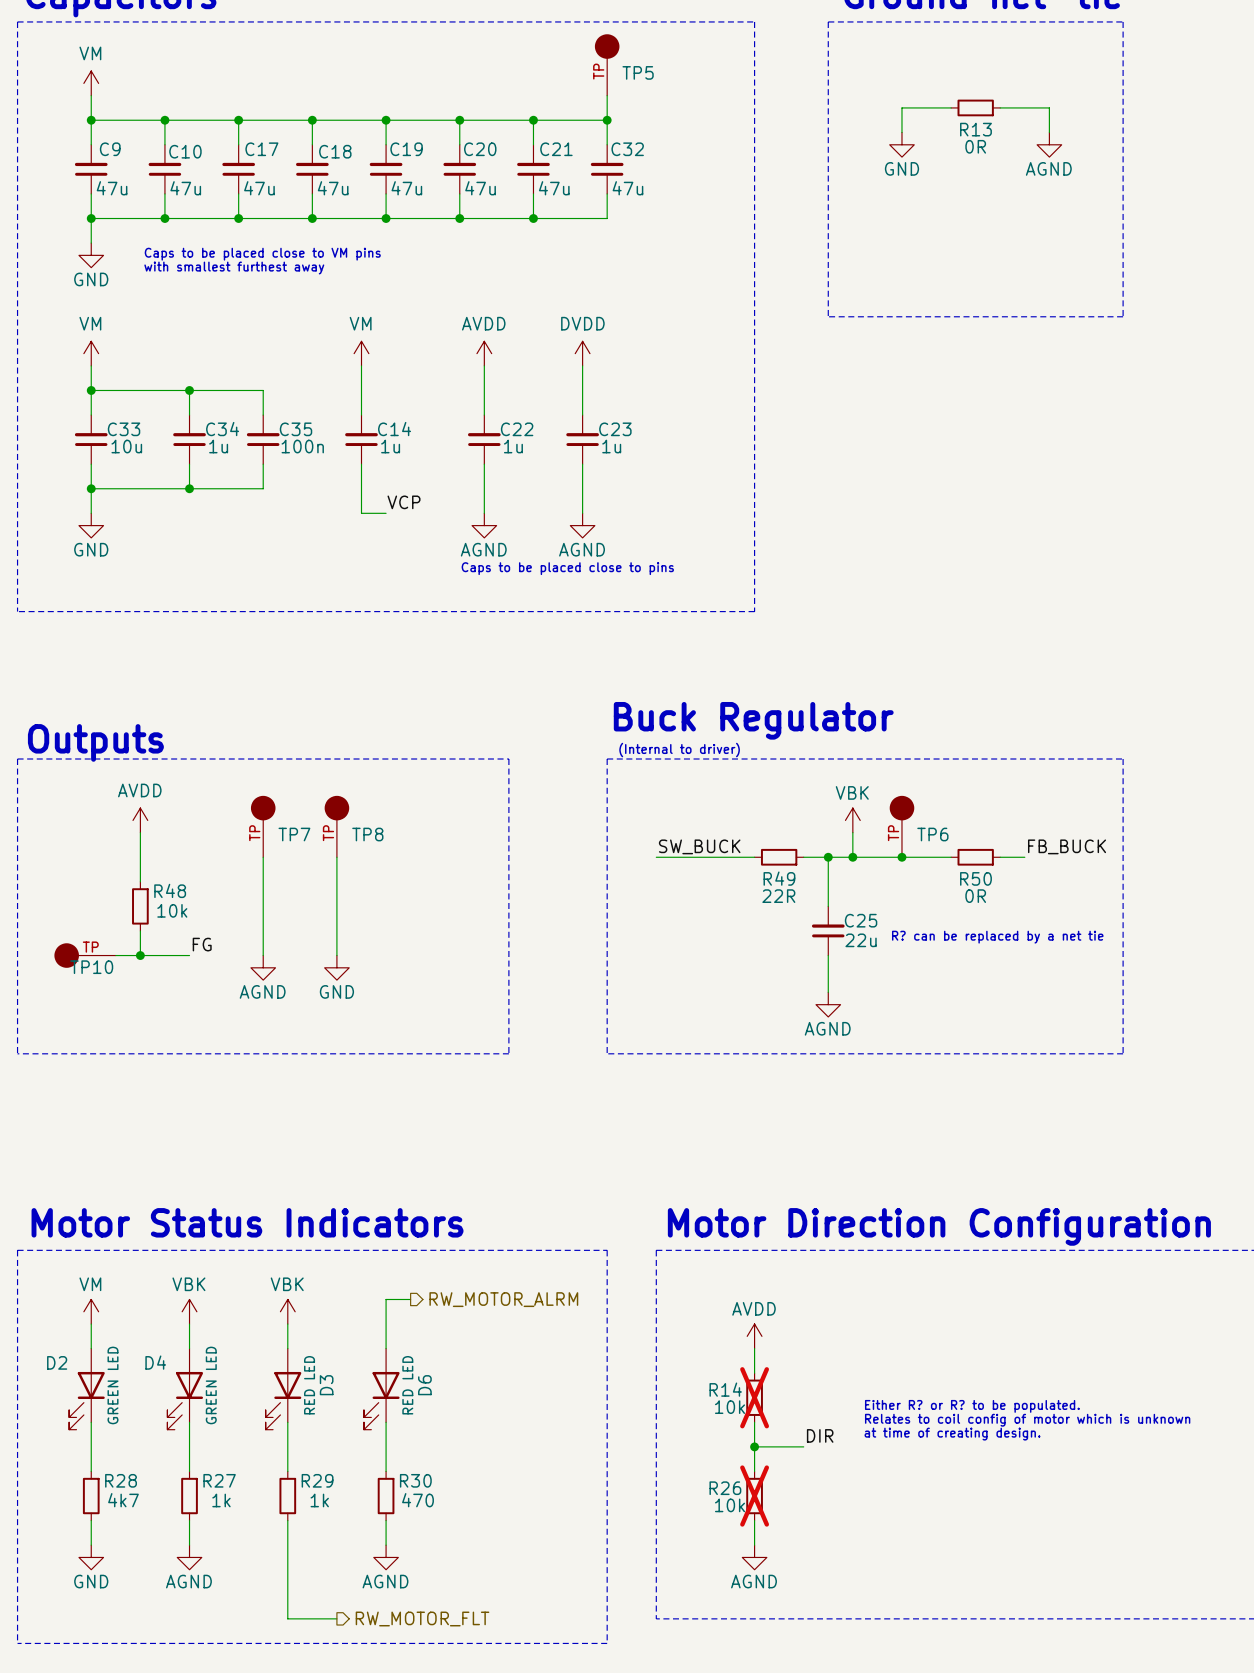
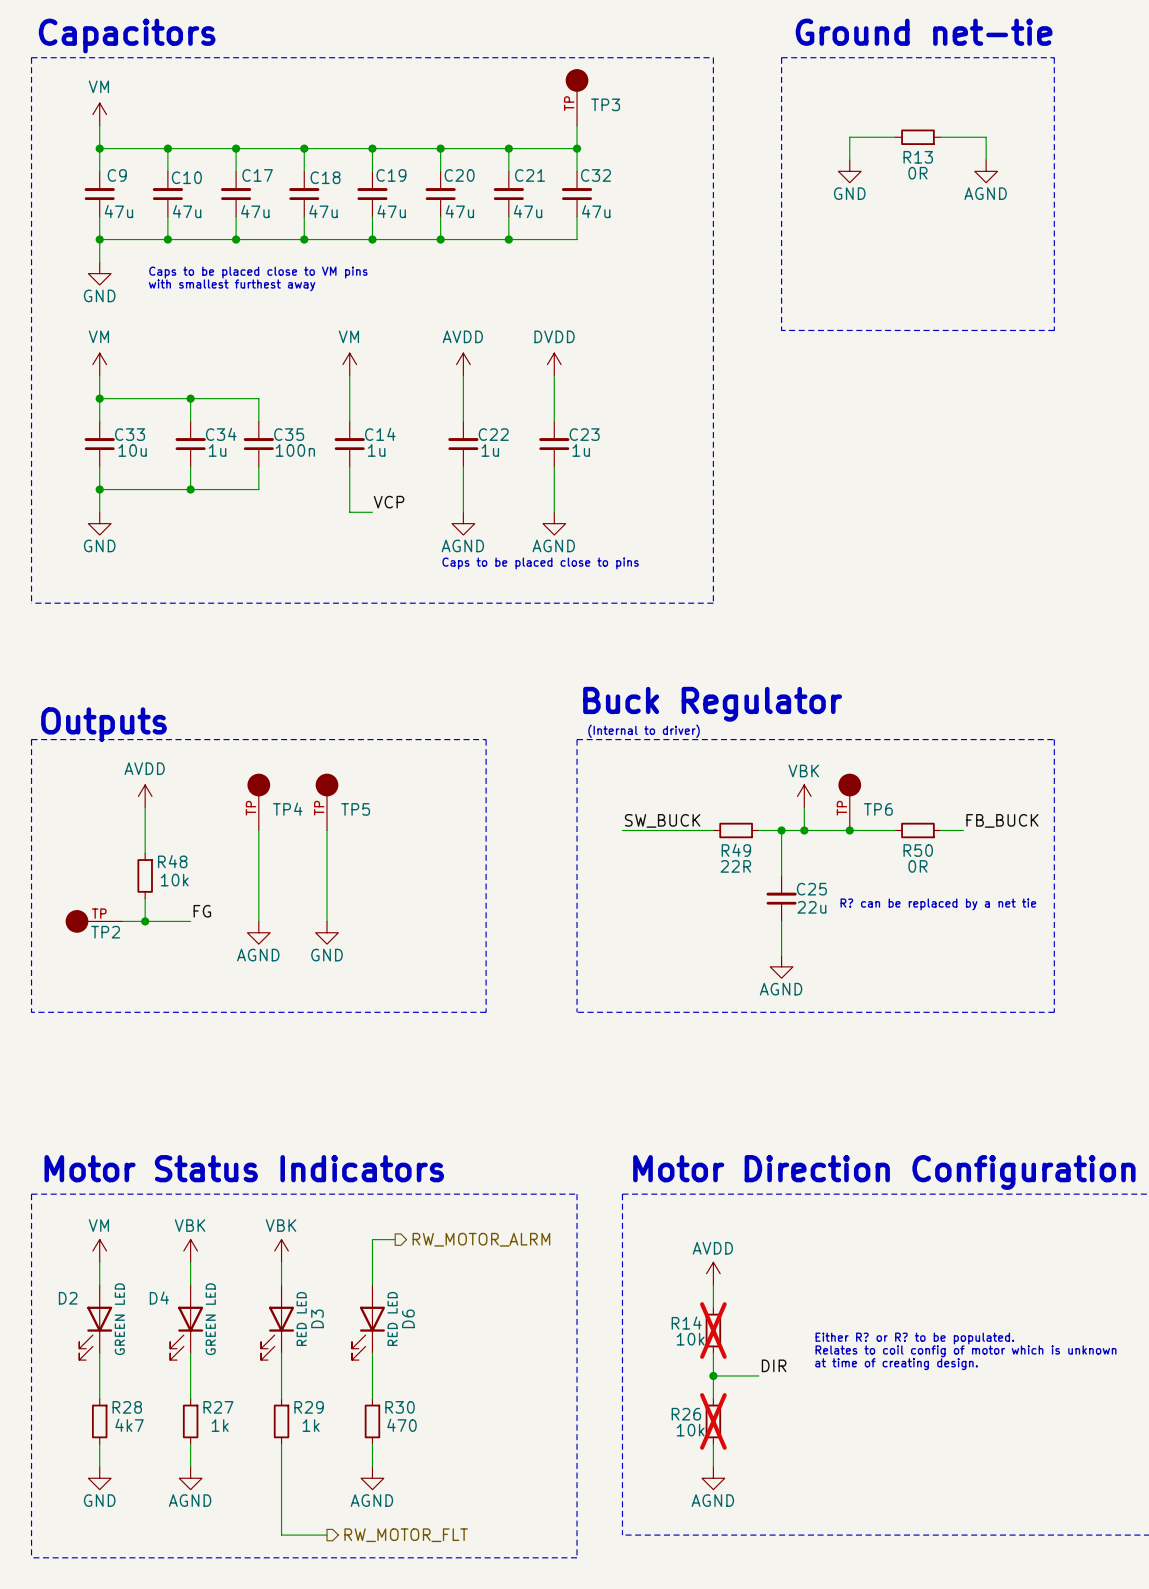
TP5 name: TP5 (638, 72) -> TP3 (605, 104)
TP7 name: TP7 (294, 834) -> TP4 (287, 809)
TP8 name: TP8 (367, 834) -> TP5 (355, 809)
TP10 name: TP10 (91, 967) -> TP2 (105, 932)

